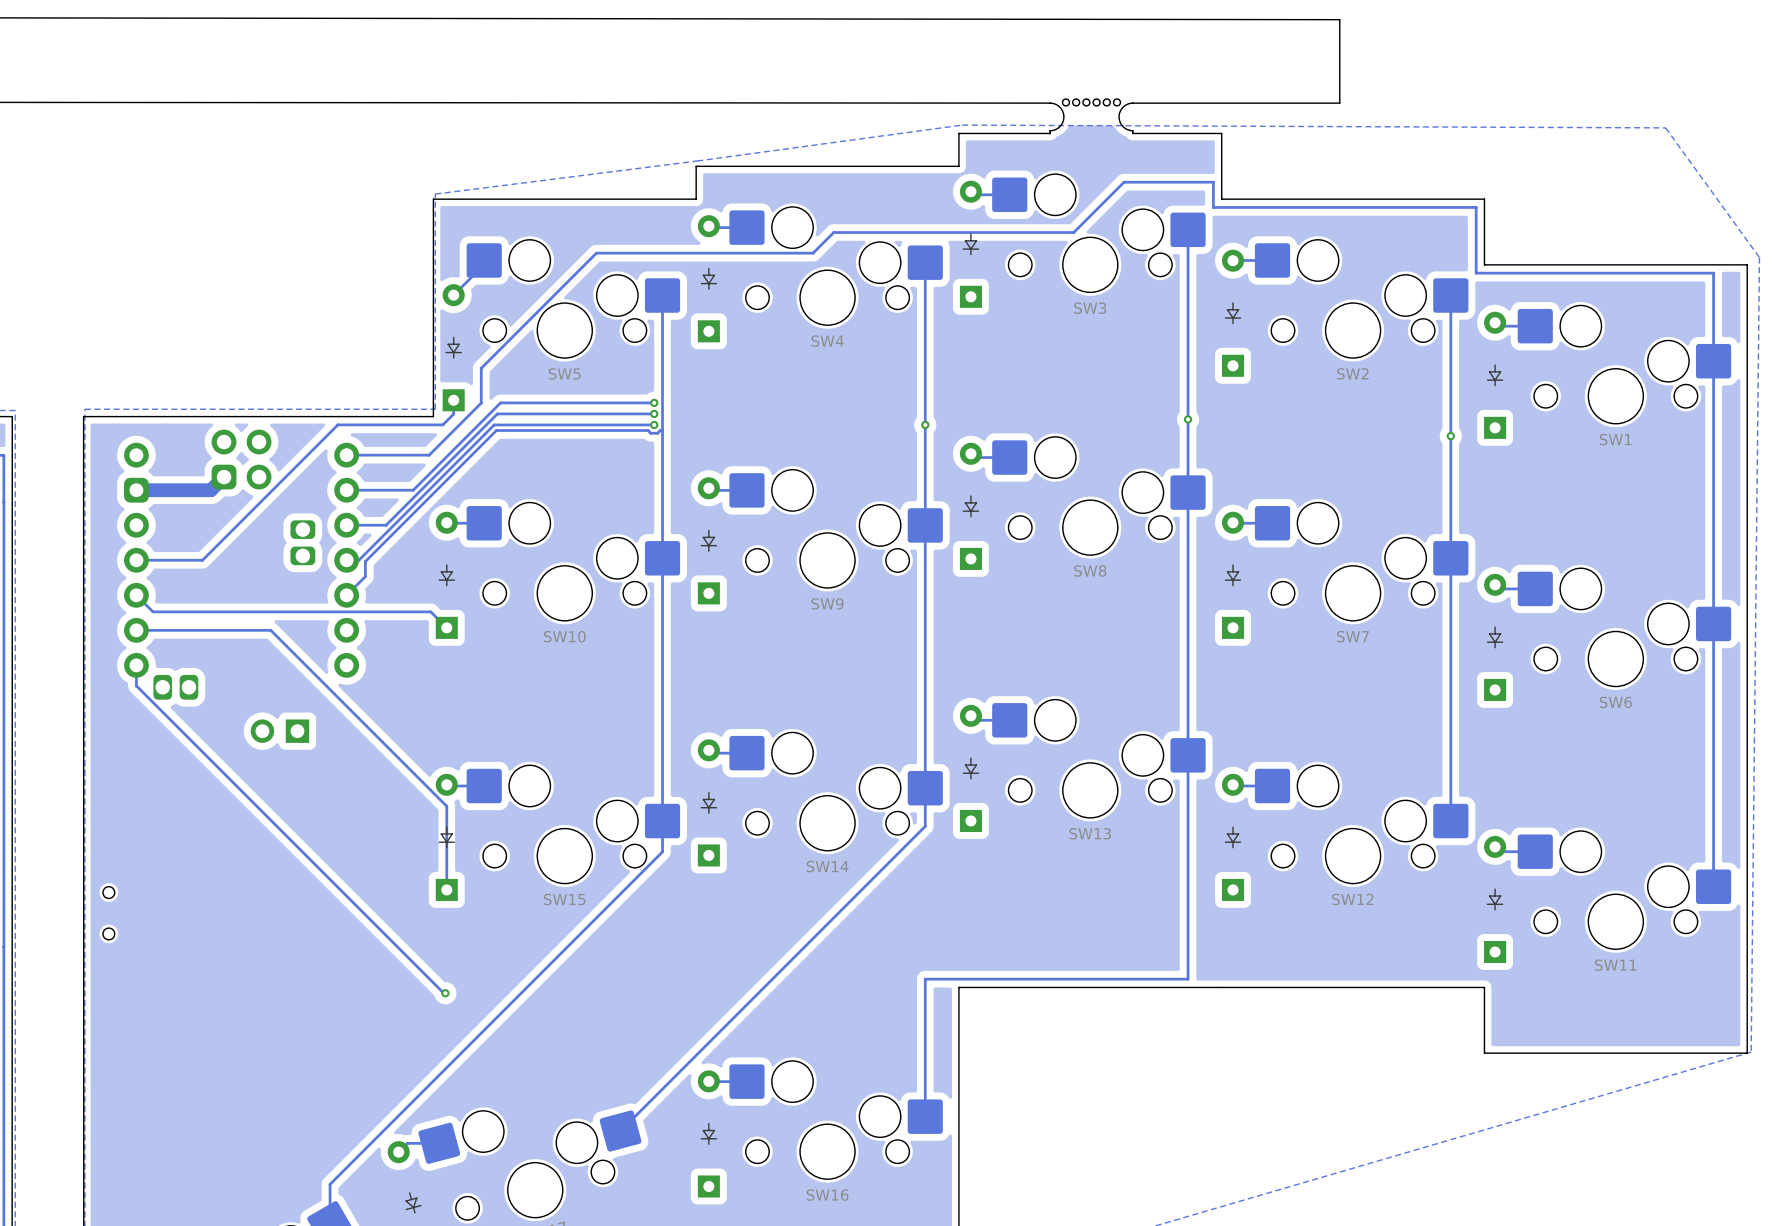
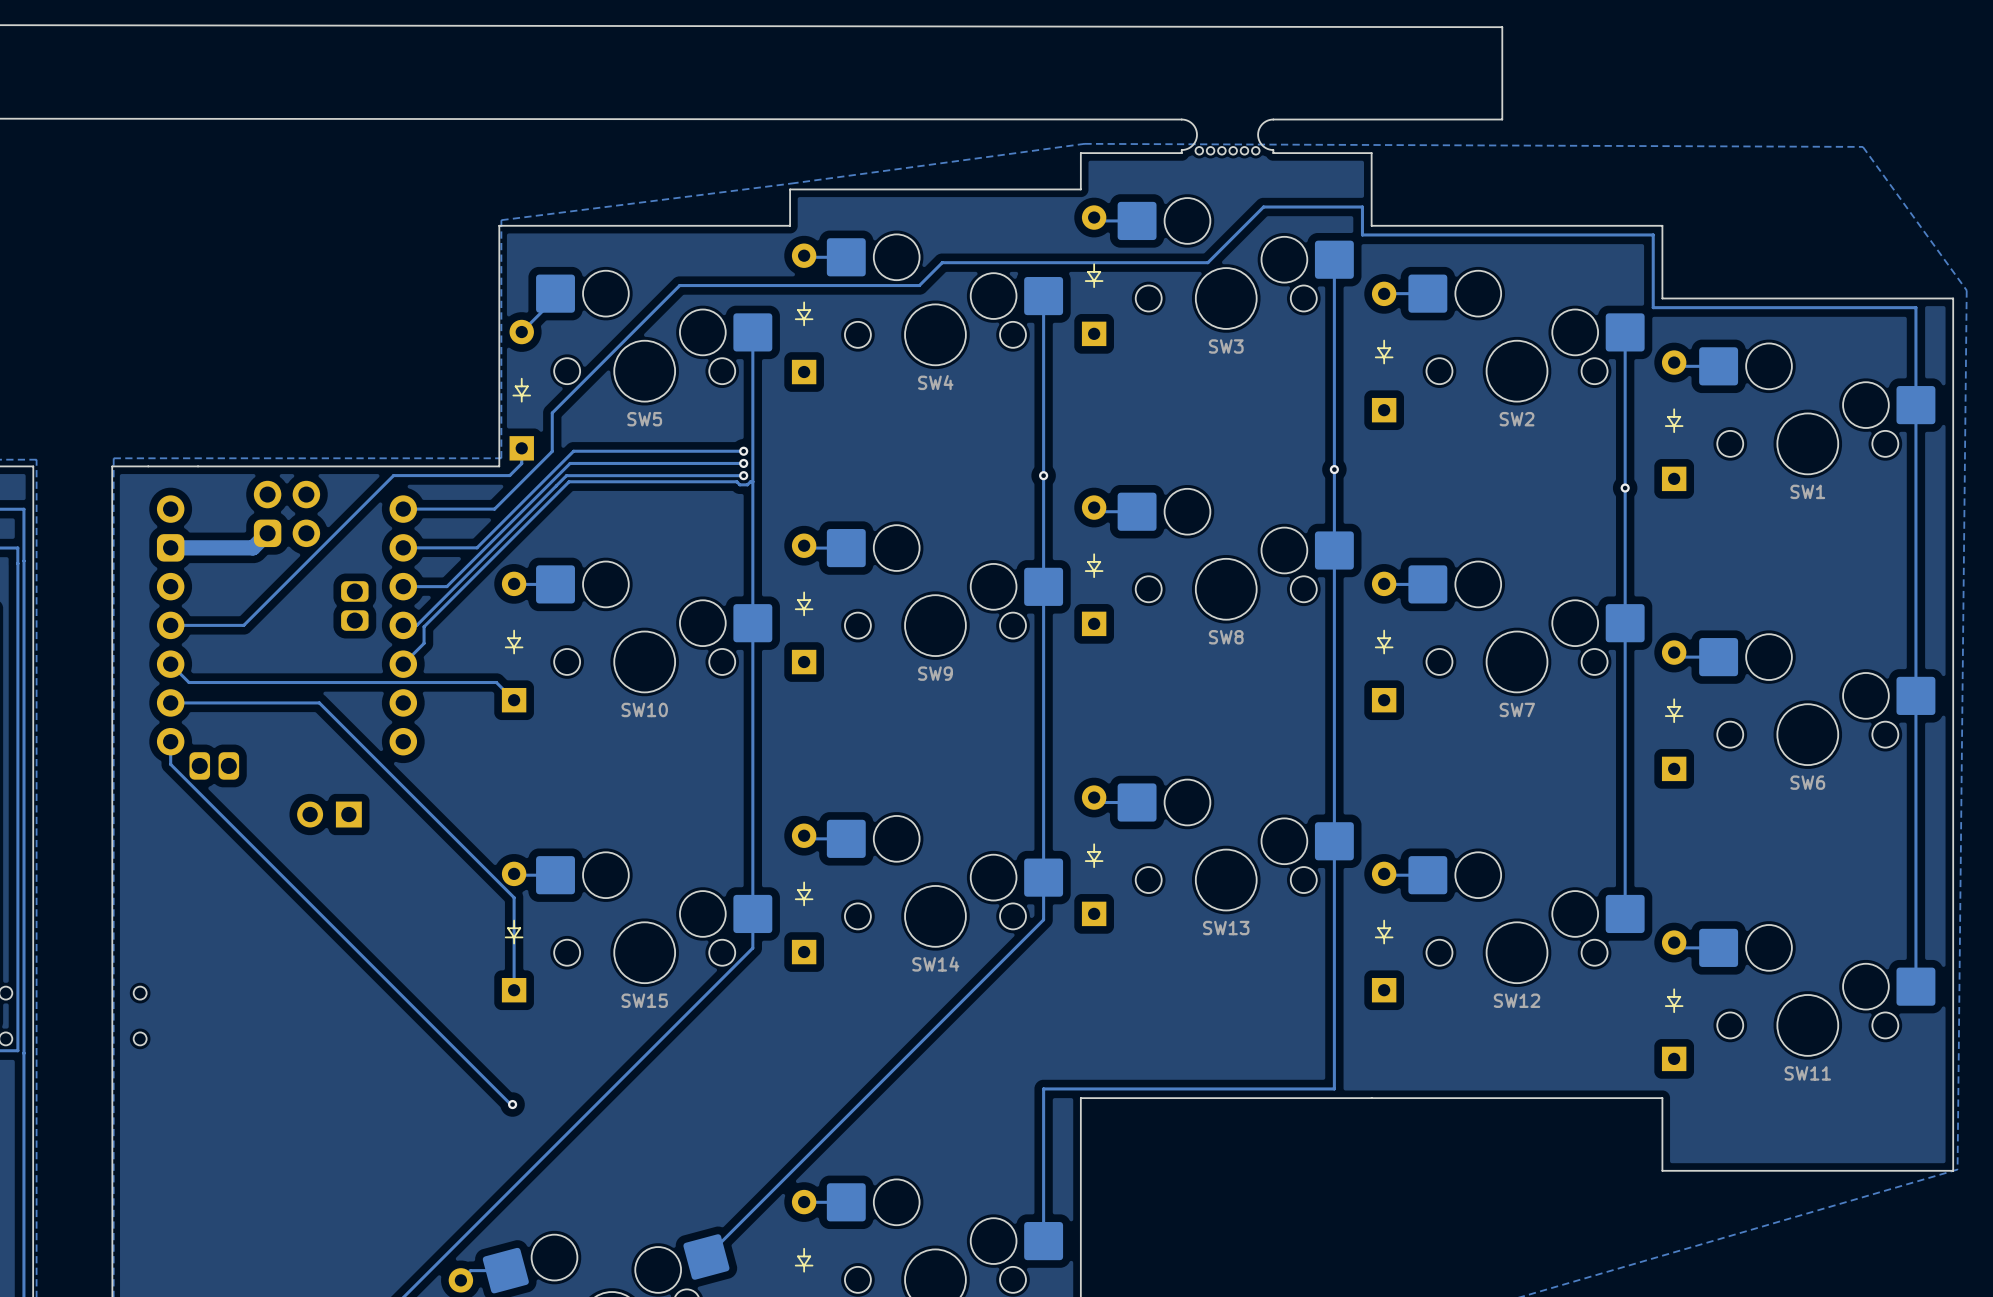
part rotation: 0° (1091, 115) -> 180° (1227, 136)

